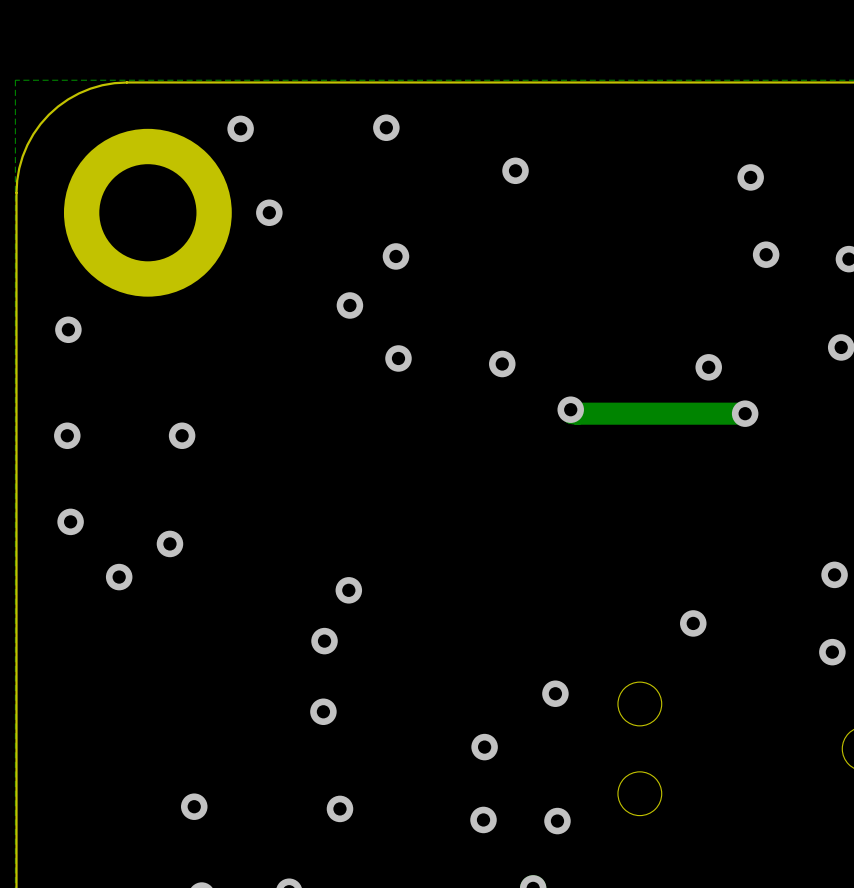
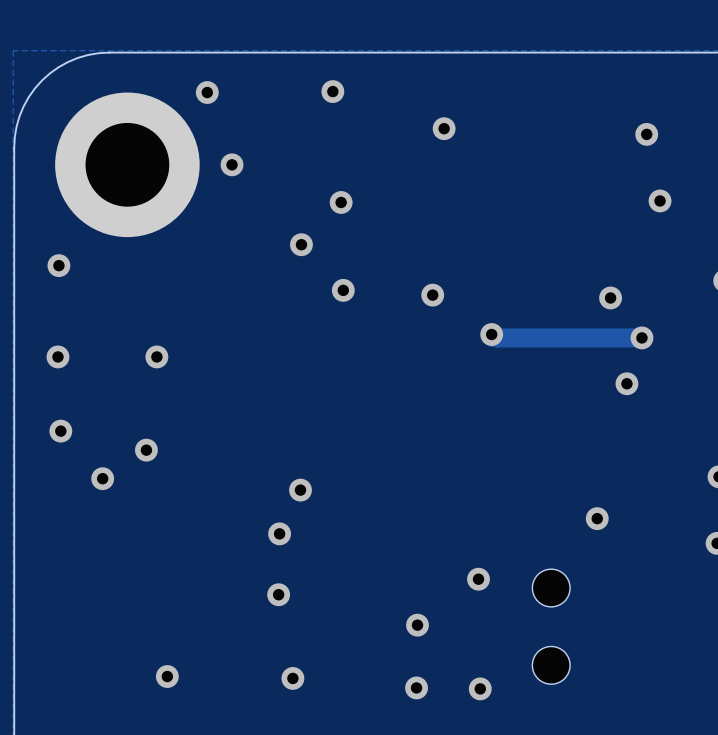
via: none -> (626, 383)

